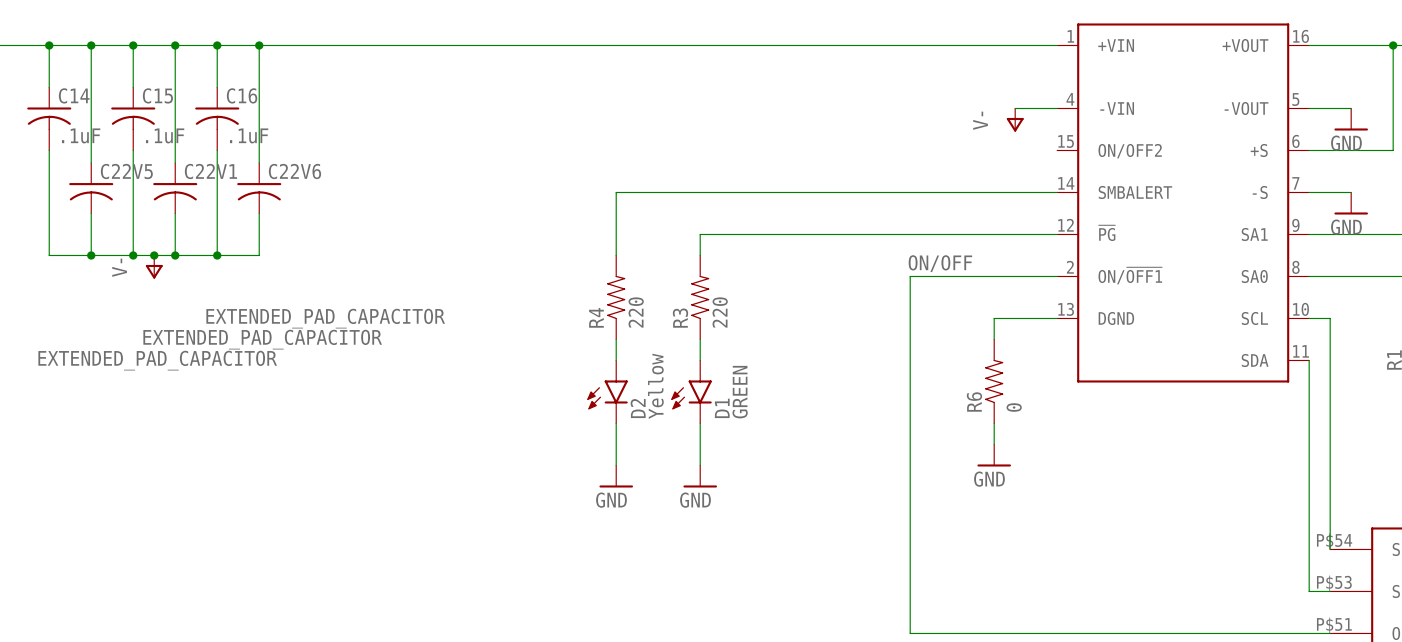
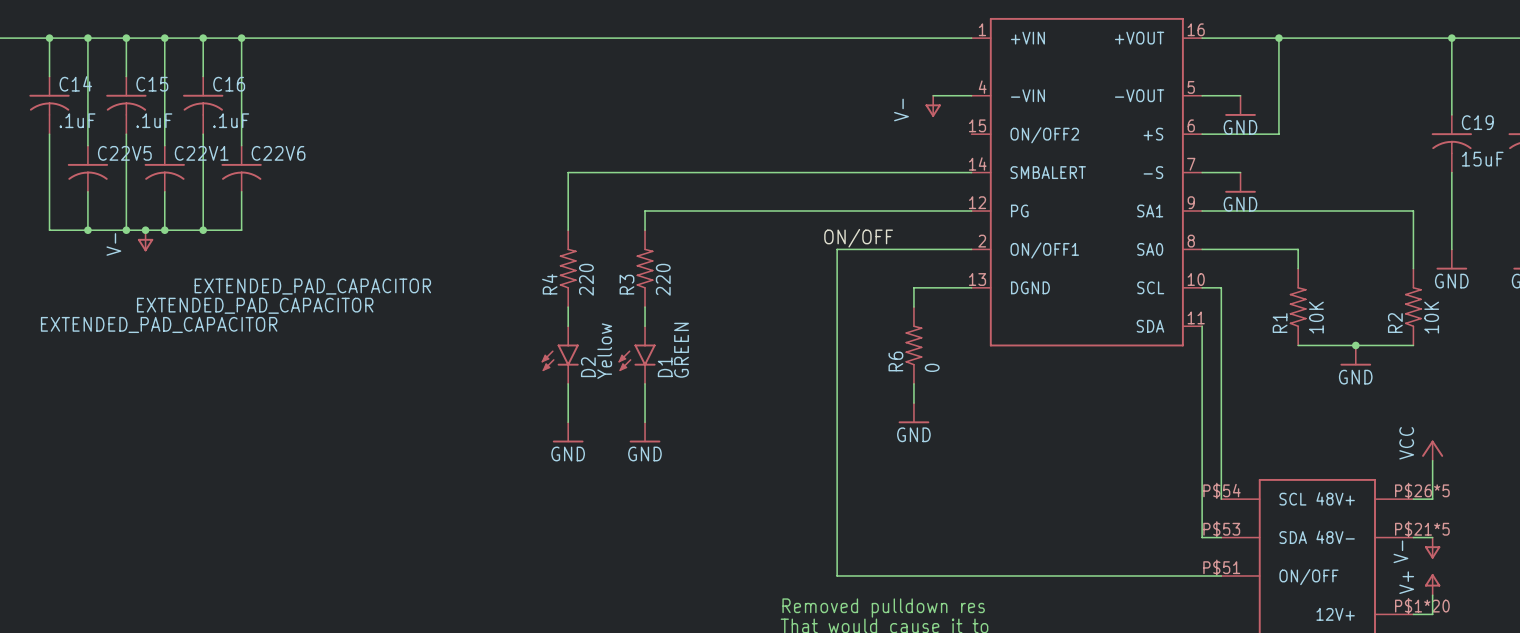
part pin name: ~{PG} (1107, 233) -> PG (1019, 211)
part pin name: ON/~{OFF1} (1130, 275) -> ON/OFF1 (1044, 250)

